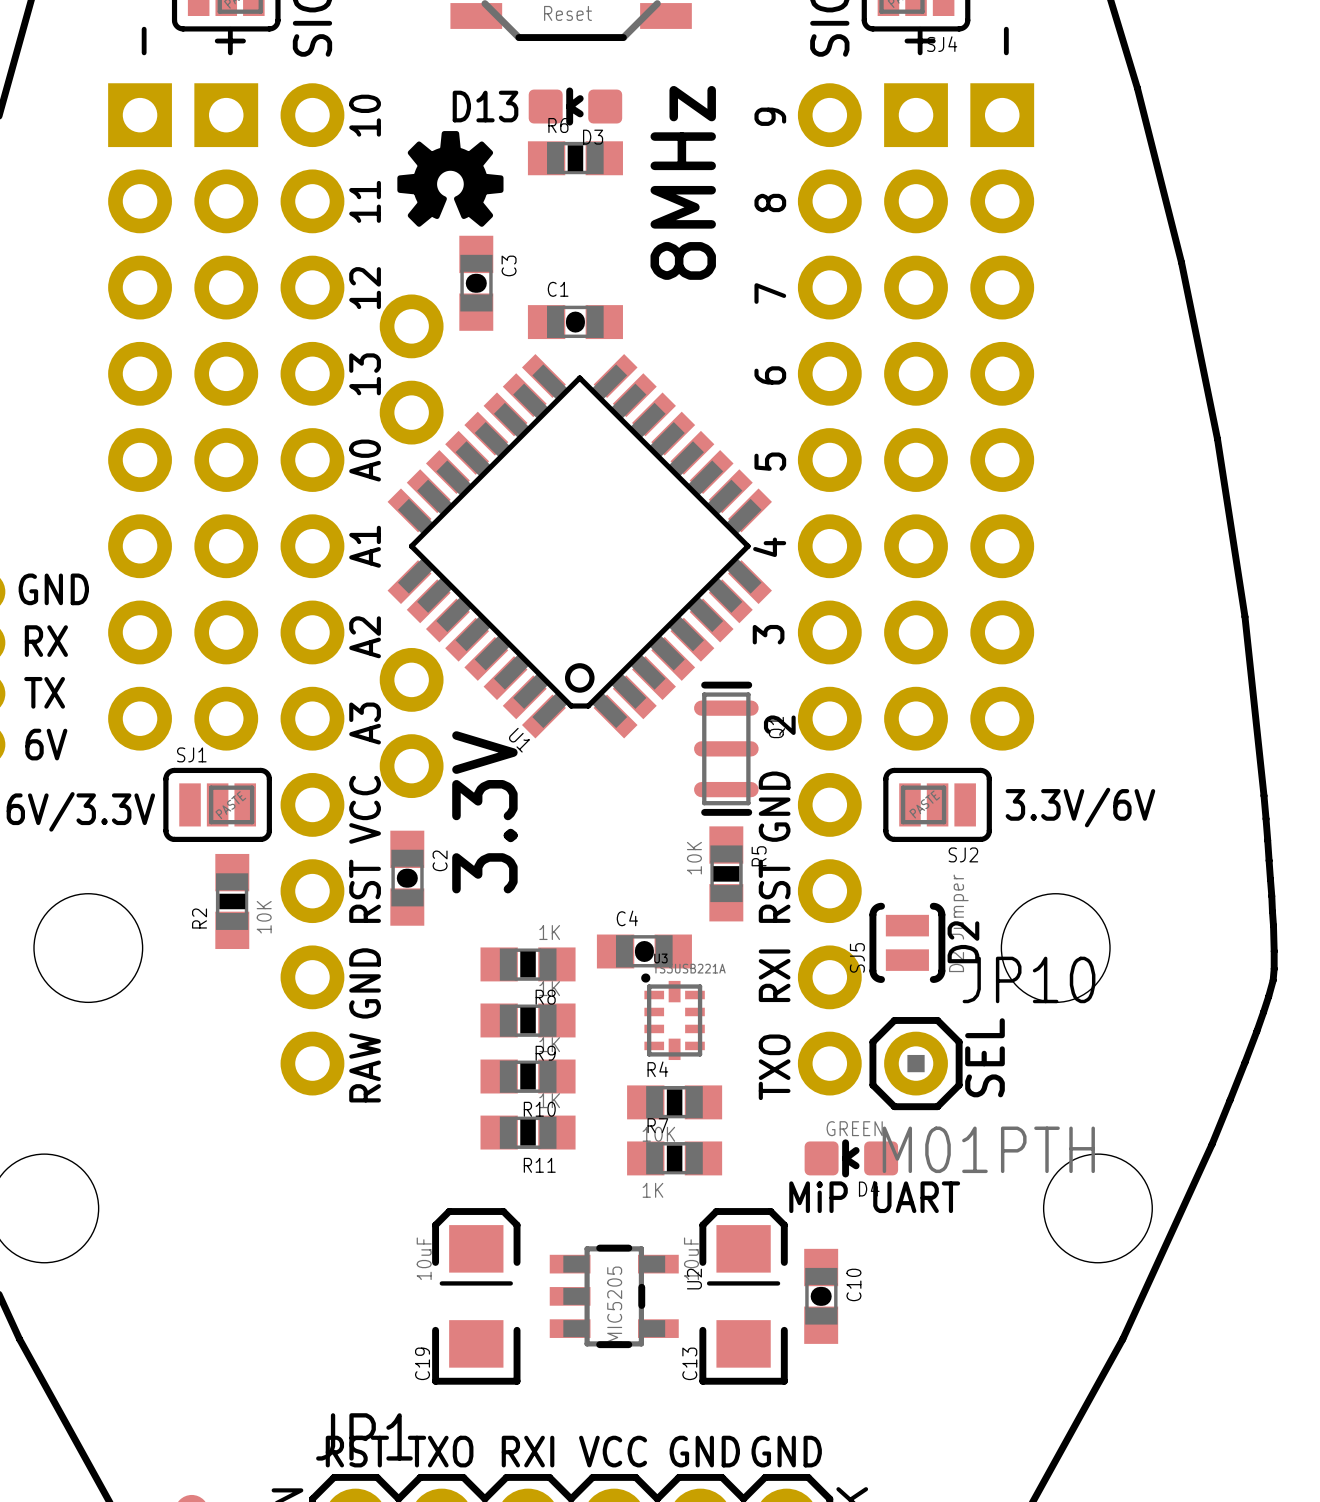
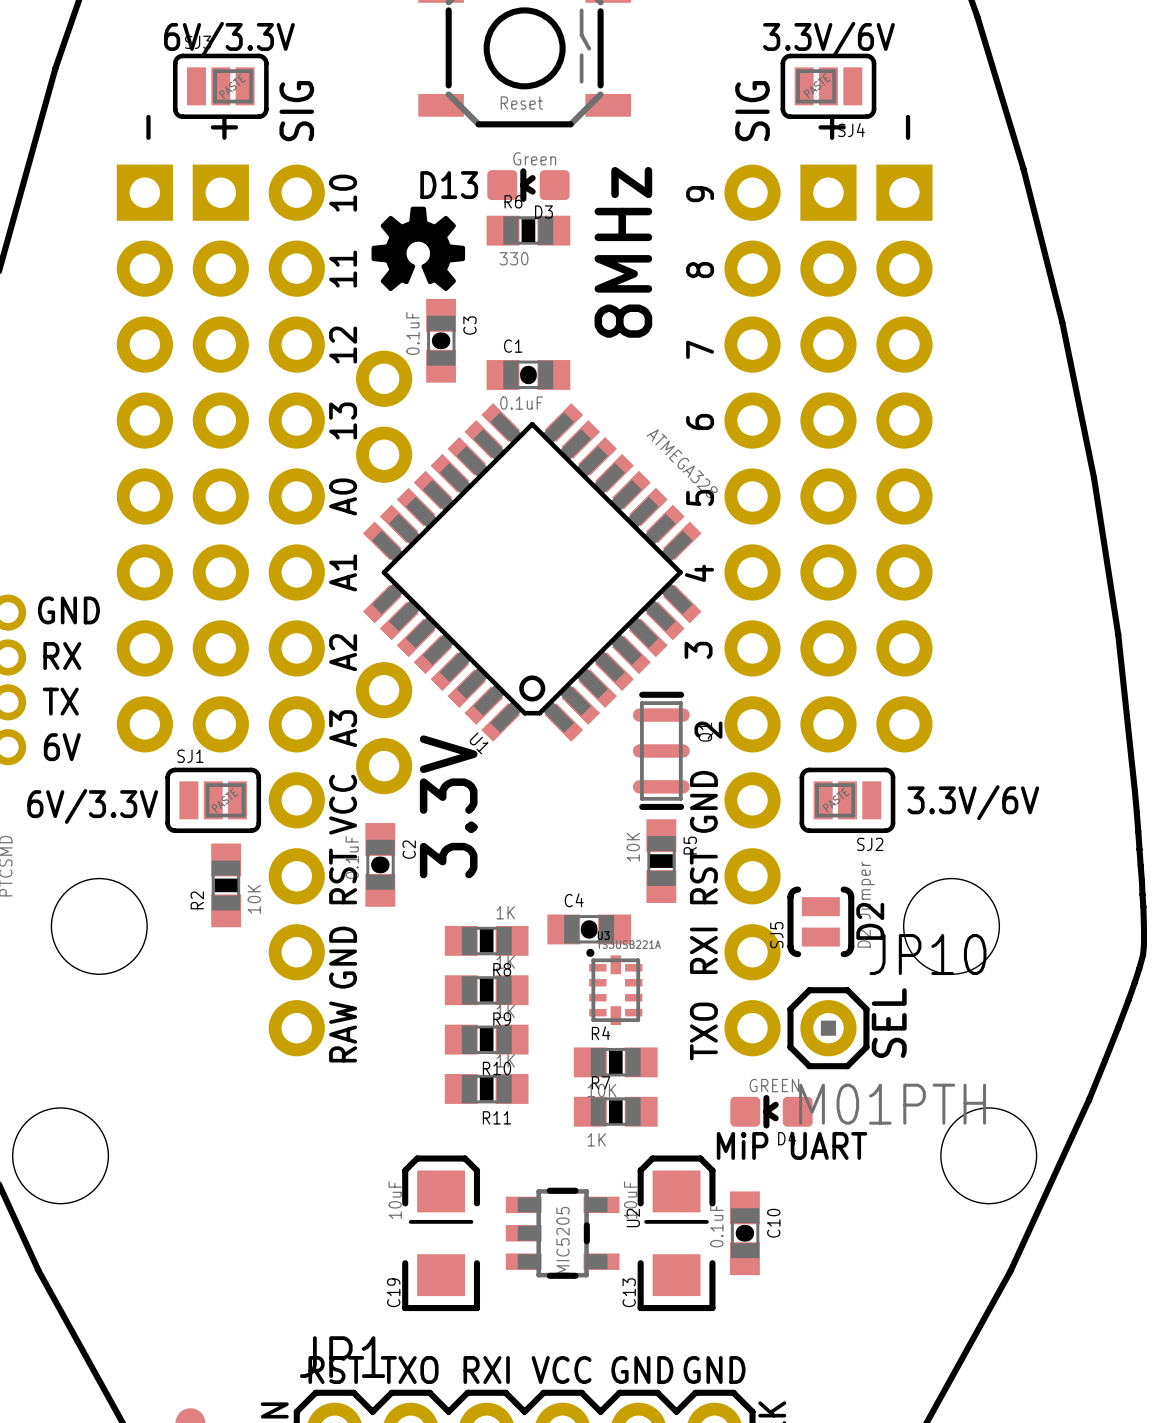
D3 value: none -> Green (534, 158)
R6 value: none -> 330 (514, 258)
C3 value: none -> 0.1uF (412, 333)
C1 value: none -> 0.1uF (521, 403)
U1 value: none -> ATMEGA328 (682, 463)
C2 value: none -> 0.1uF (352, 857)
C10 value: none -> 0.1uF (716, 1225)

